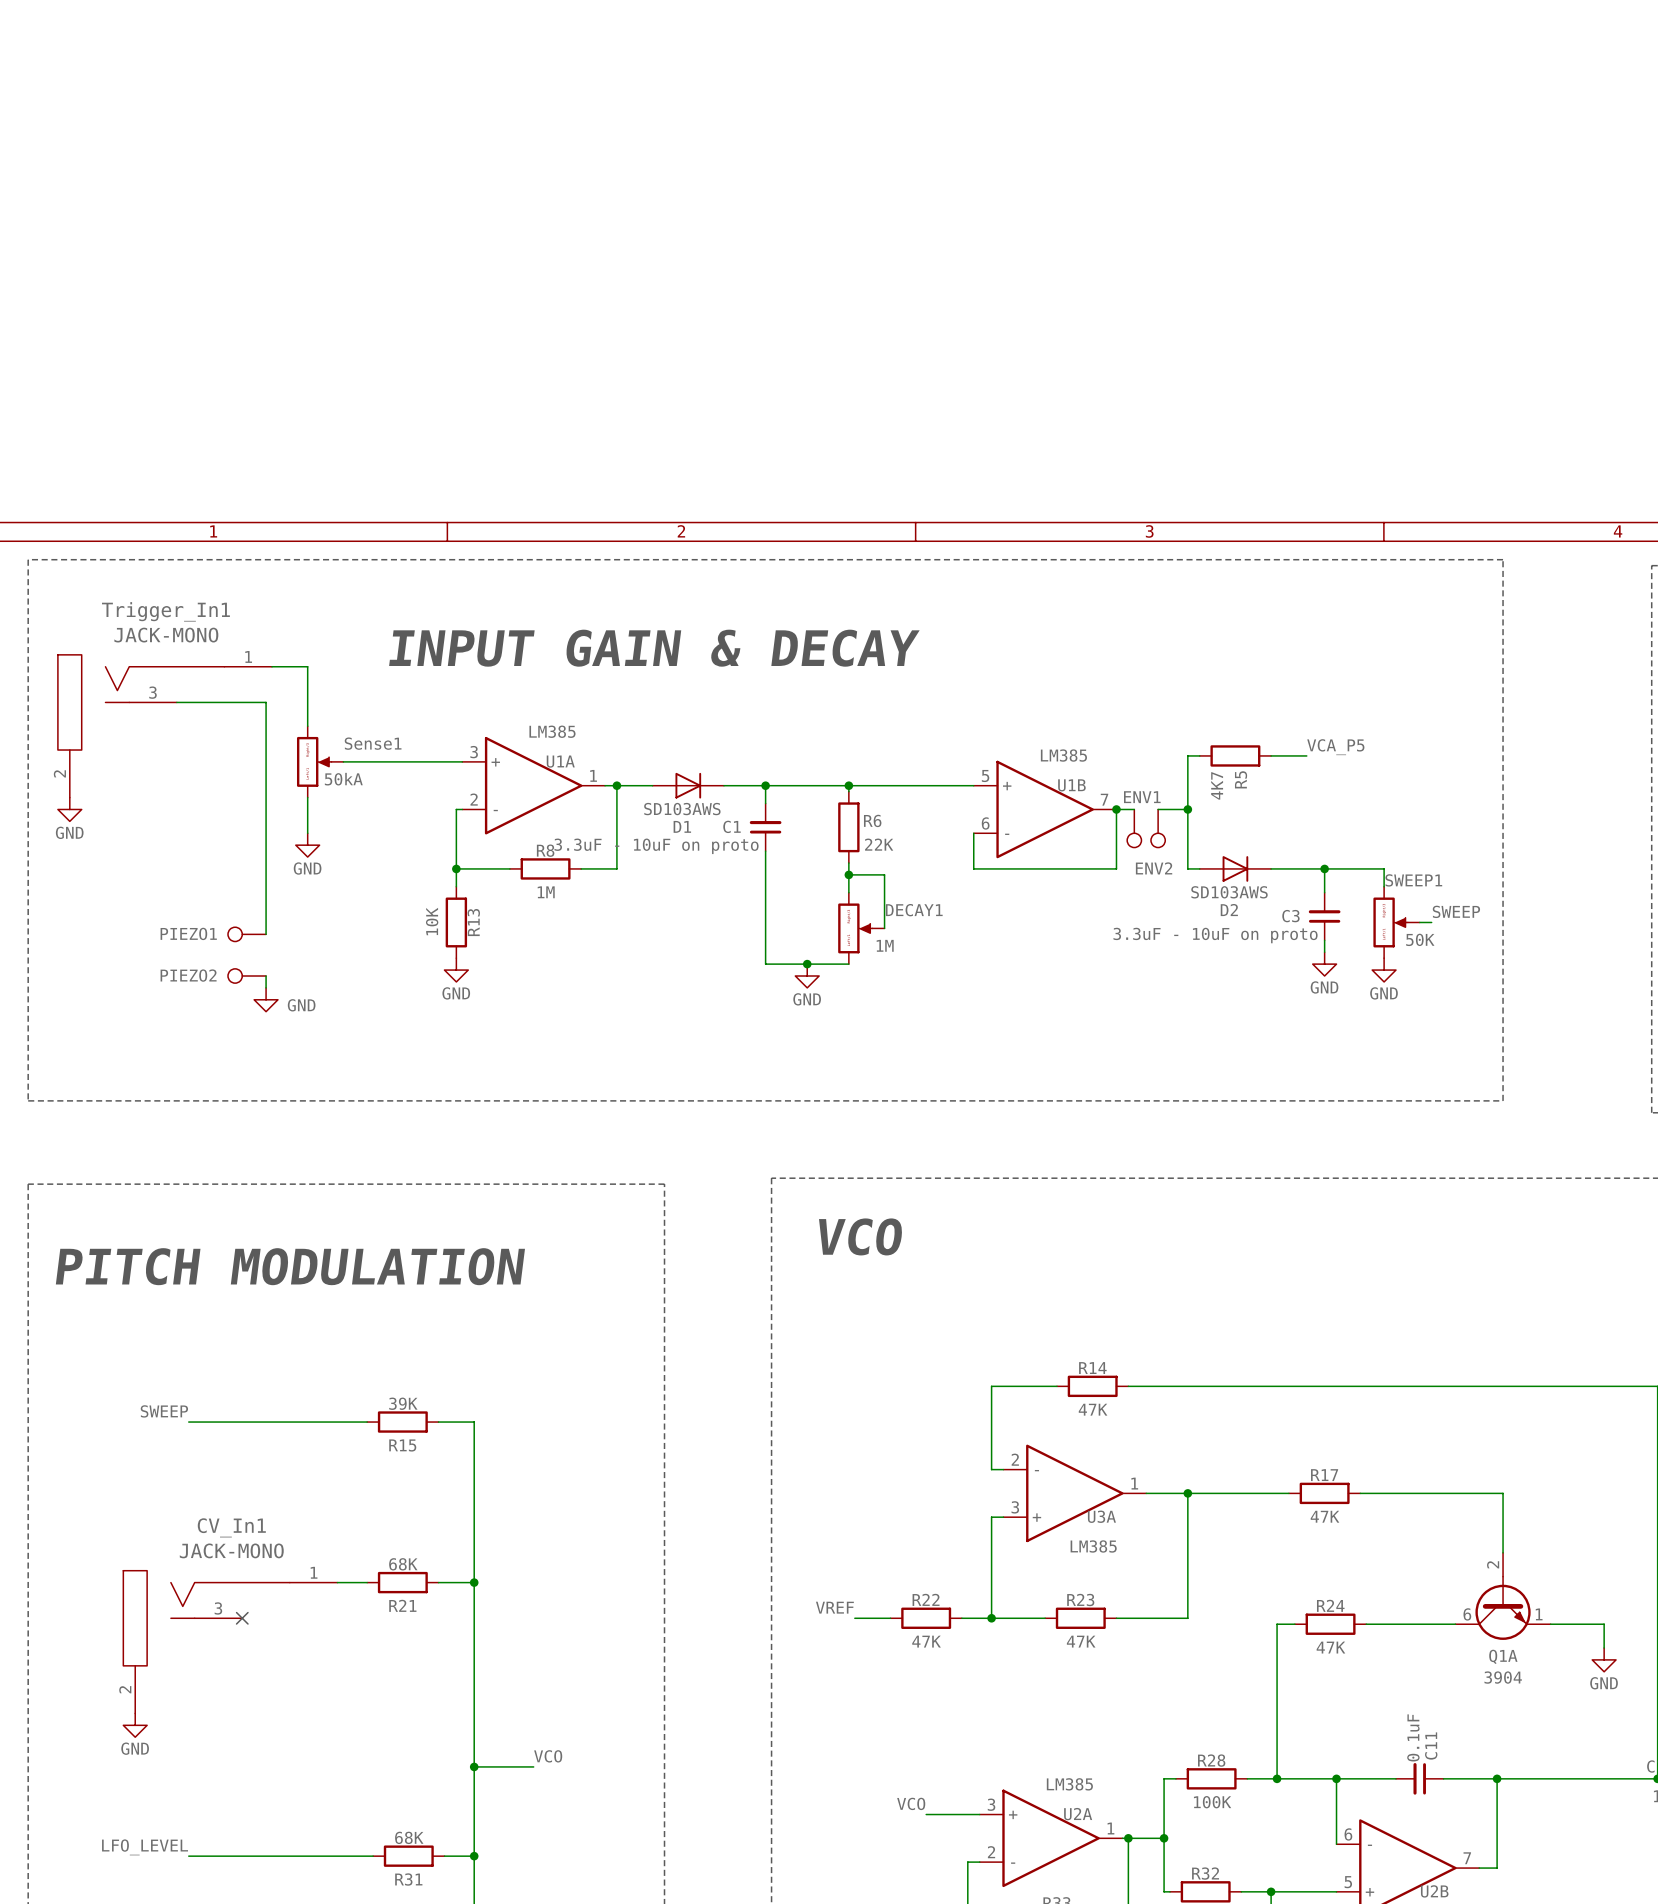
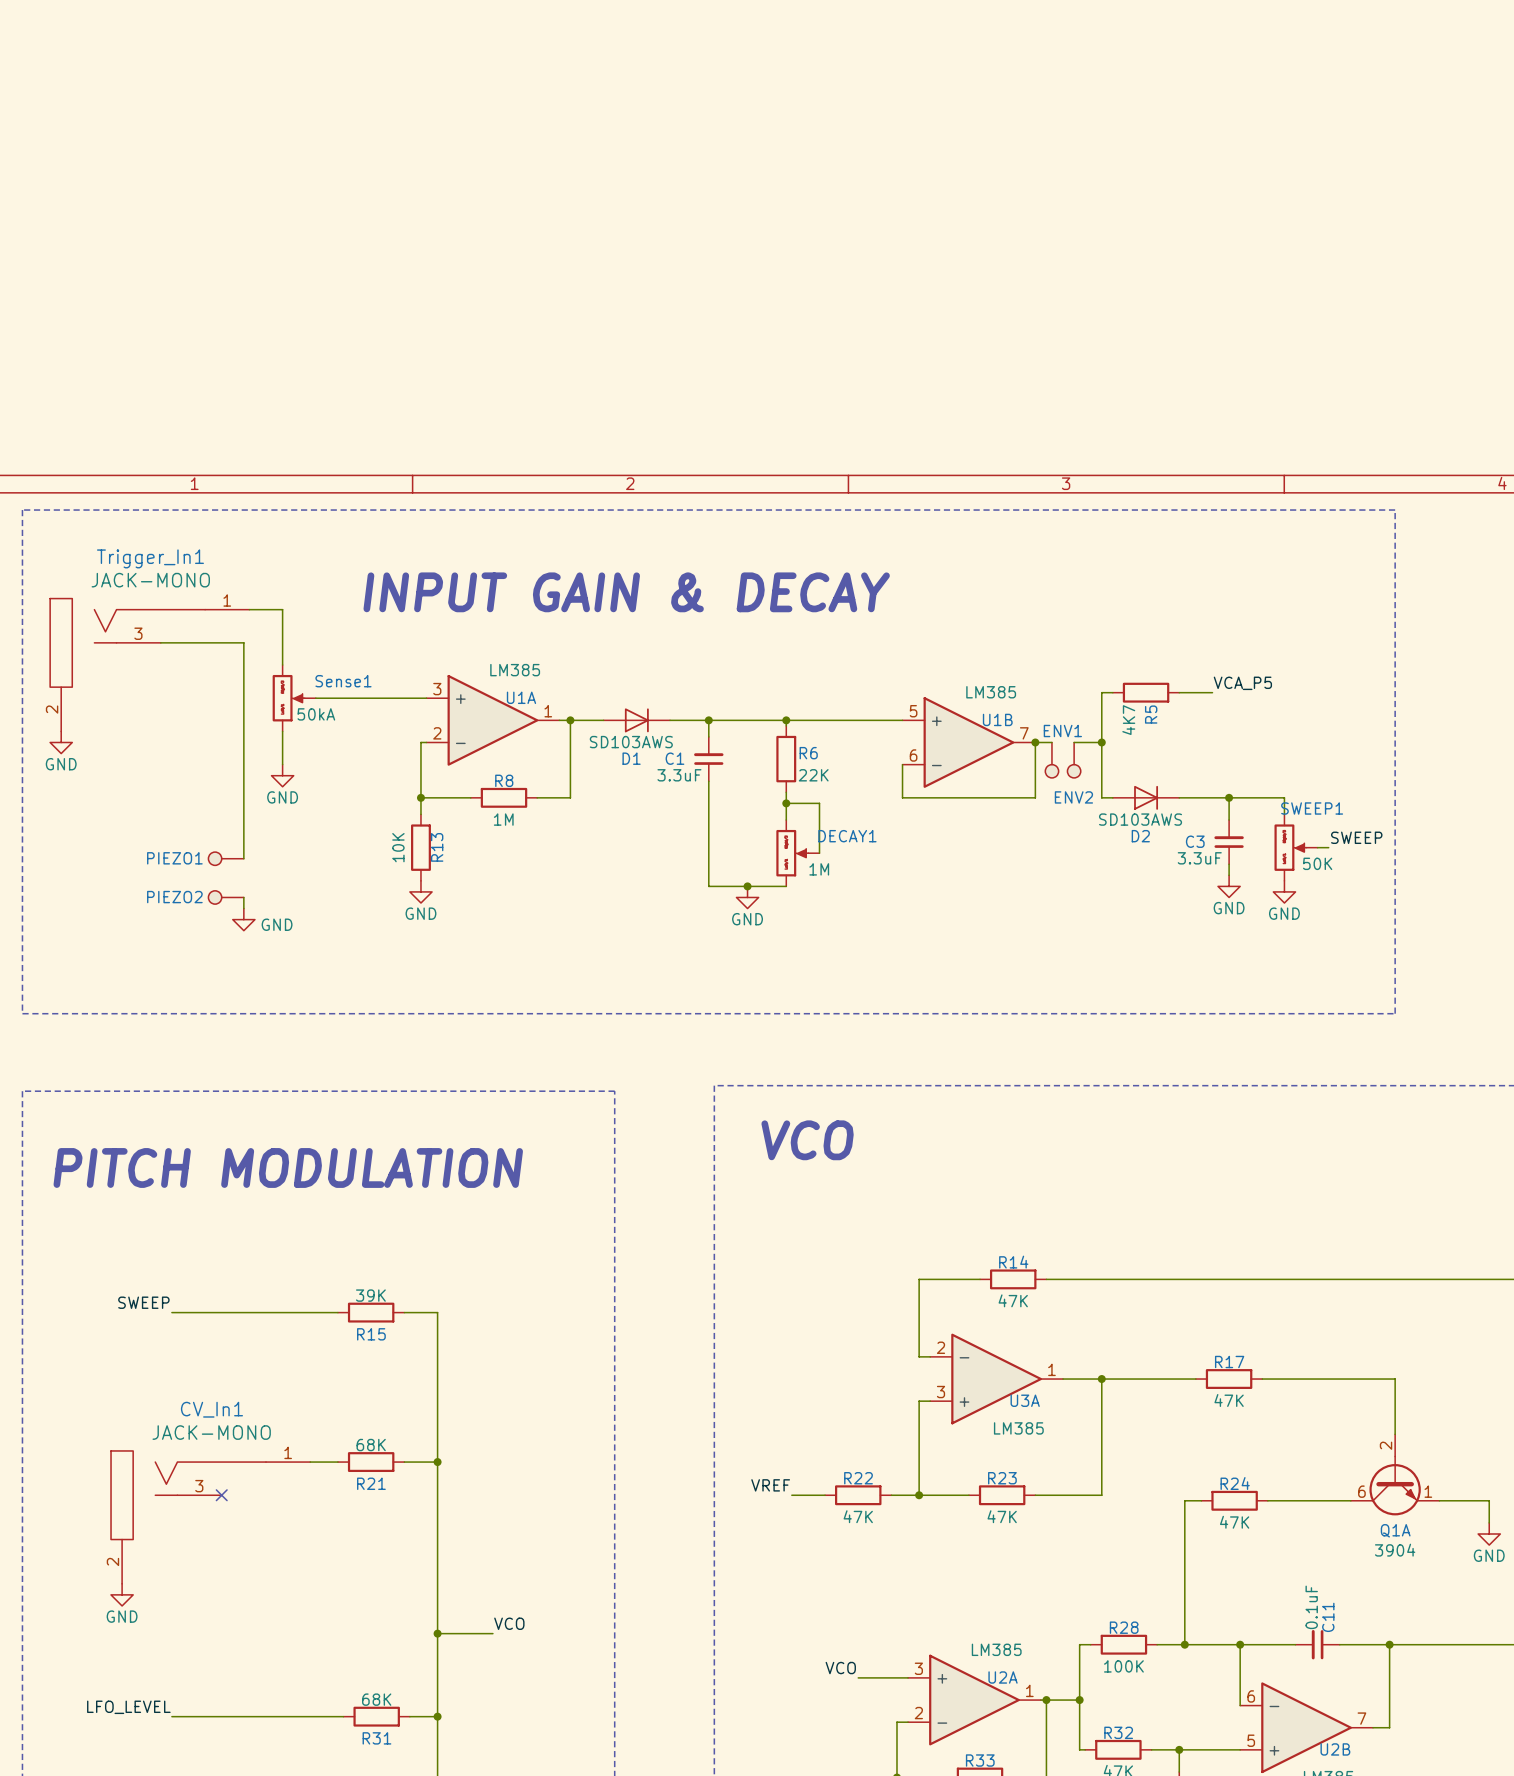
C1 value: 3.3uF - 10uF on proto (656, 846) -> 3.3uF (679, 775)
C3 value: 3.3uF - 10uF on proto (1215, 935) -> 3.3uF (1199, 858)

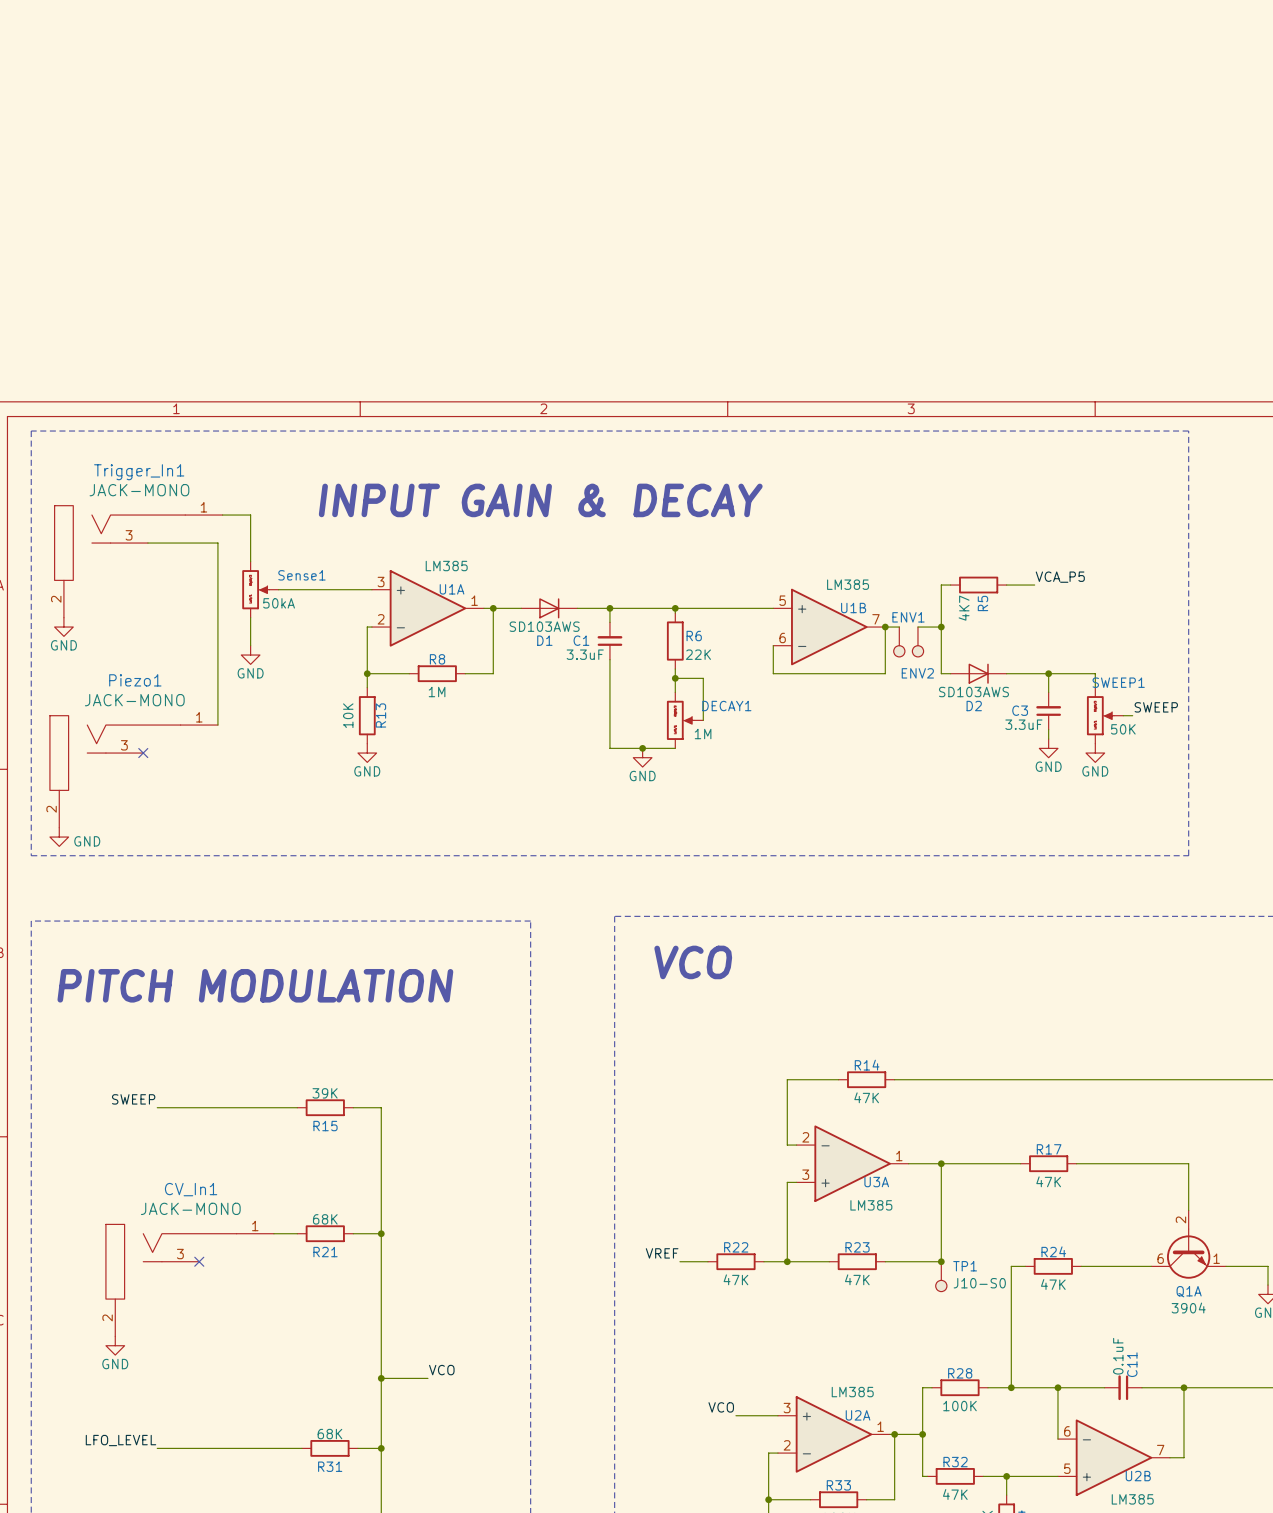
PIEZO1: (226, 858) -> none
no-connect mark: none -> (143, 753)
PIEZO2: (226, 897) -> none
wire: (243, 897) (243, 908) -> none
Piezo1: none -> JACK-MONO (133, 771)
power symbol position: GND (243, 919) -> GND (59, 837)
junction: none -> (941, 1261)
TP1: none -> J10-S0 (941, 1276)

